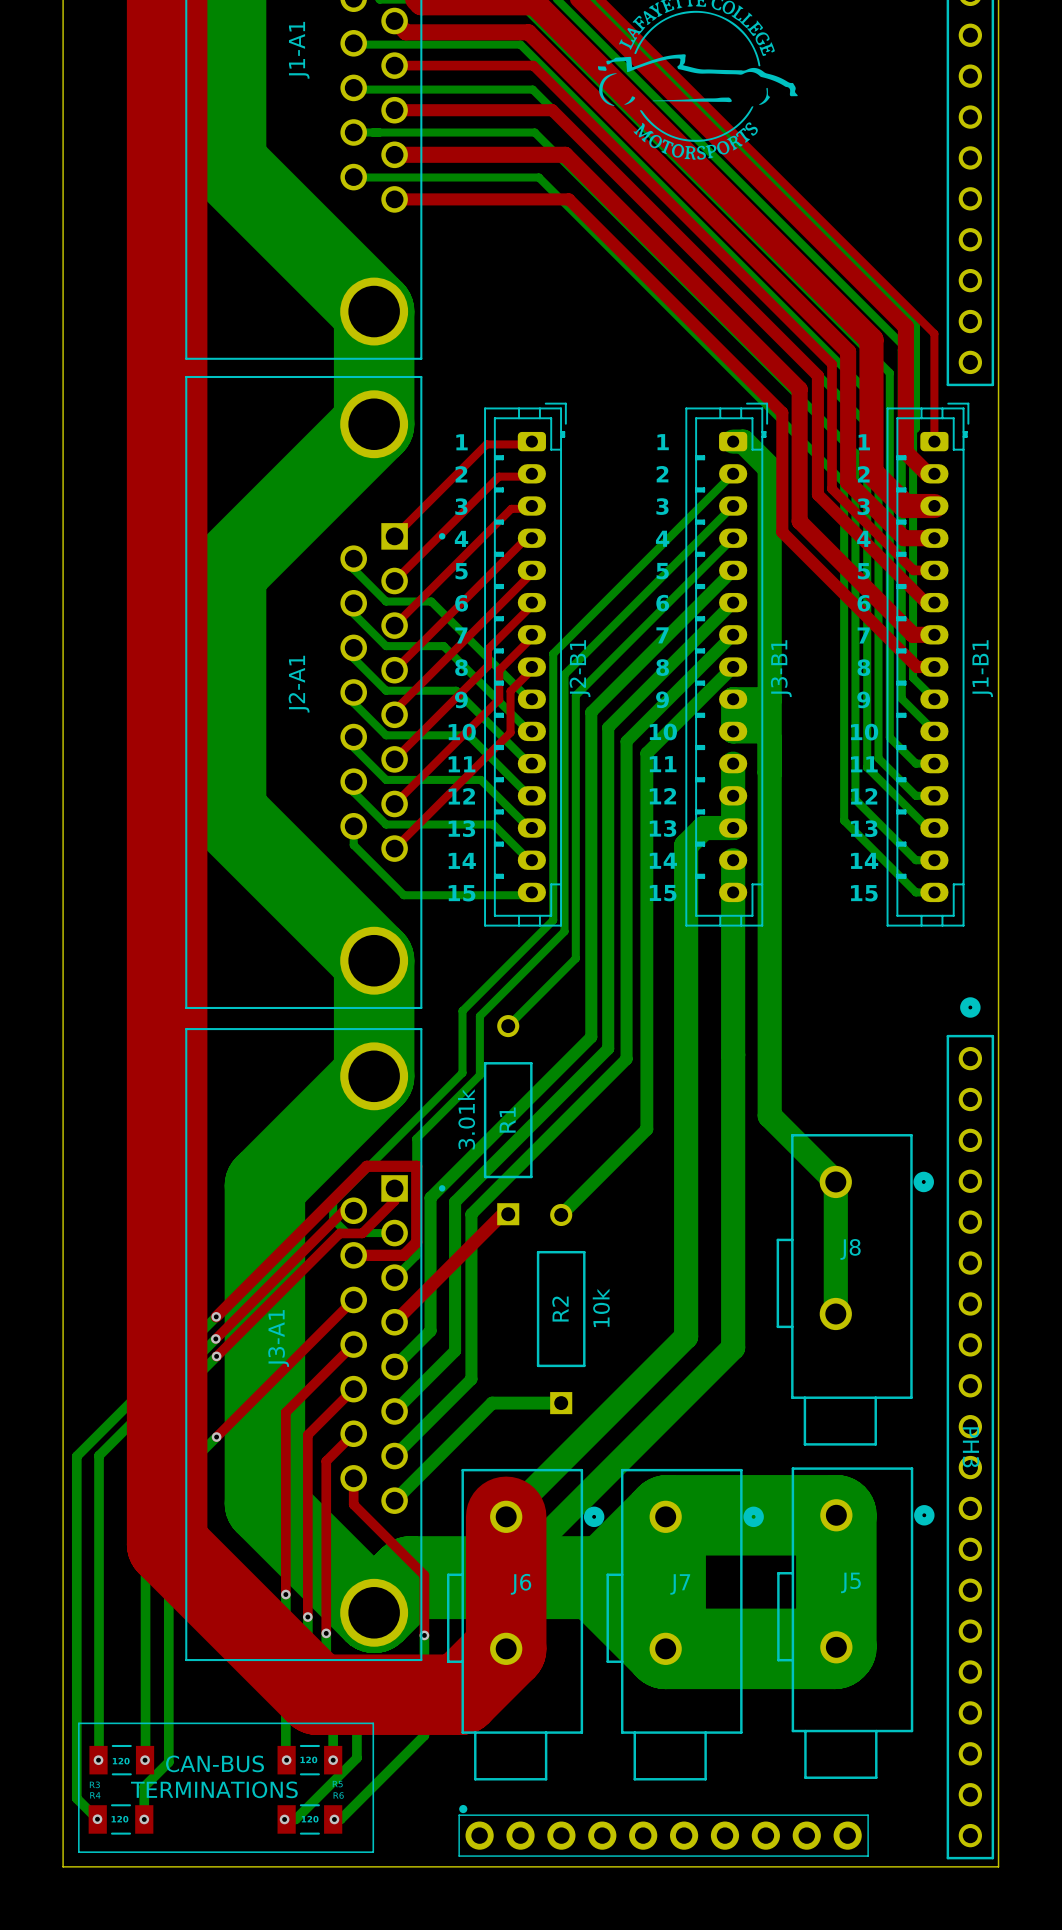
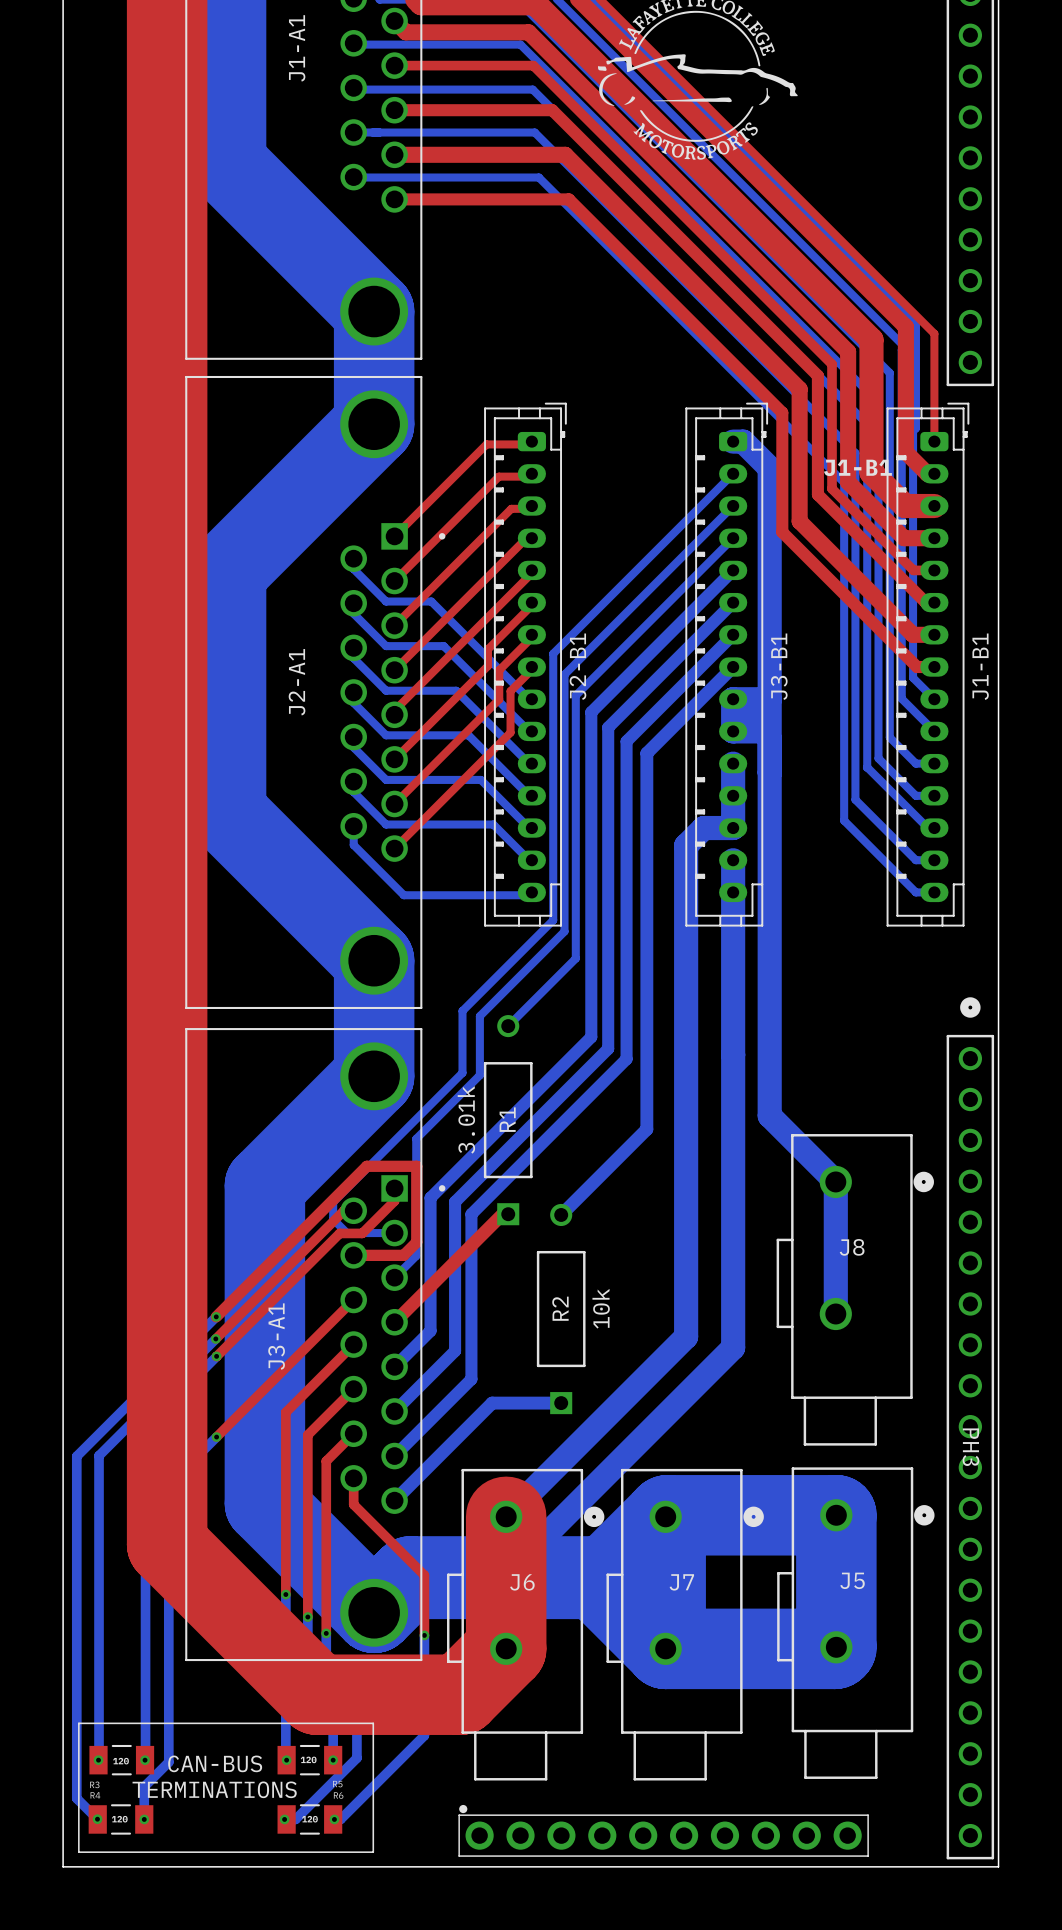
text: 1 (462, 442) -> none
text: 1 (663, 442) -> none
text: 1 (864, 442) -> none
text: none -> J1-B1 (857, 467)
text: 2 (461, 474) -> none
text: 2 (662, 474) -> none
text: 2 (863, 474) -> none
text: 3 (461, 506) -> none
text: 3 (662, 506) -> none
text: 3 (863, 506) -> none
text: 4 (461, 538) -> none
text: 4 (662, 538) -> none
text: 4 (863, 538) -> none
text: 5 (461, 571) -> none
text: 5 (662, 571) -> none
text: 5 (863, 571) -> none
text: 6 (461, 603) -> none
text: 6 (662, 603) -> none
text: 6 (863, 603) -> none
text: 7 (461, 635) -> none
text: 7 (662, 635) -> none
text: 7 (863, 635) -> none
text: 8 (461, 667) -> none
text: 8 (662, 667) -> none
text: 8 (863, 667) -> none
text: 9 (461, 699) -> none
text: 9 (662, 699) -> none
text: 9 (863, 699) -> none
text: 10 (663, 731) -> none
text: 10 (462, 732) -> none
text: 10 (864, 732) -> none
text: 11 (462, 764) -> none
text: 11 (663, 764) -> none
text: 11 (864, 764) -> none
text: 12 (461, 796) -> none
text: 12 (662, 796) -> none
text: 12 (864, 796) -> none
text: 13 (461, 828) -> none
text: 13 (663, 828) -> none
text: 13 (864, 828) -> none
text: 14 (462, 860) -> none
text: 14 (663, 860) -> none
text: 14 (864, 860) -> none
text: 15 (462, 893) -> none
text: 15 (663, 893) -> none
text: 15 (864, 893) -> none

